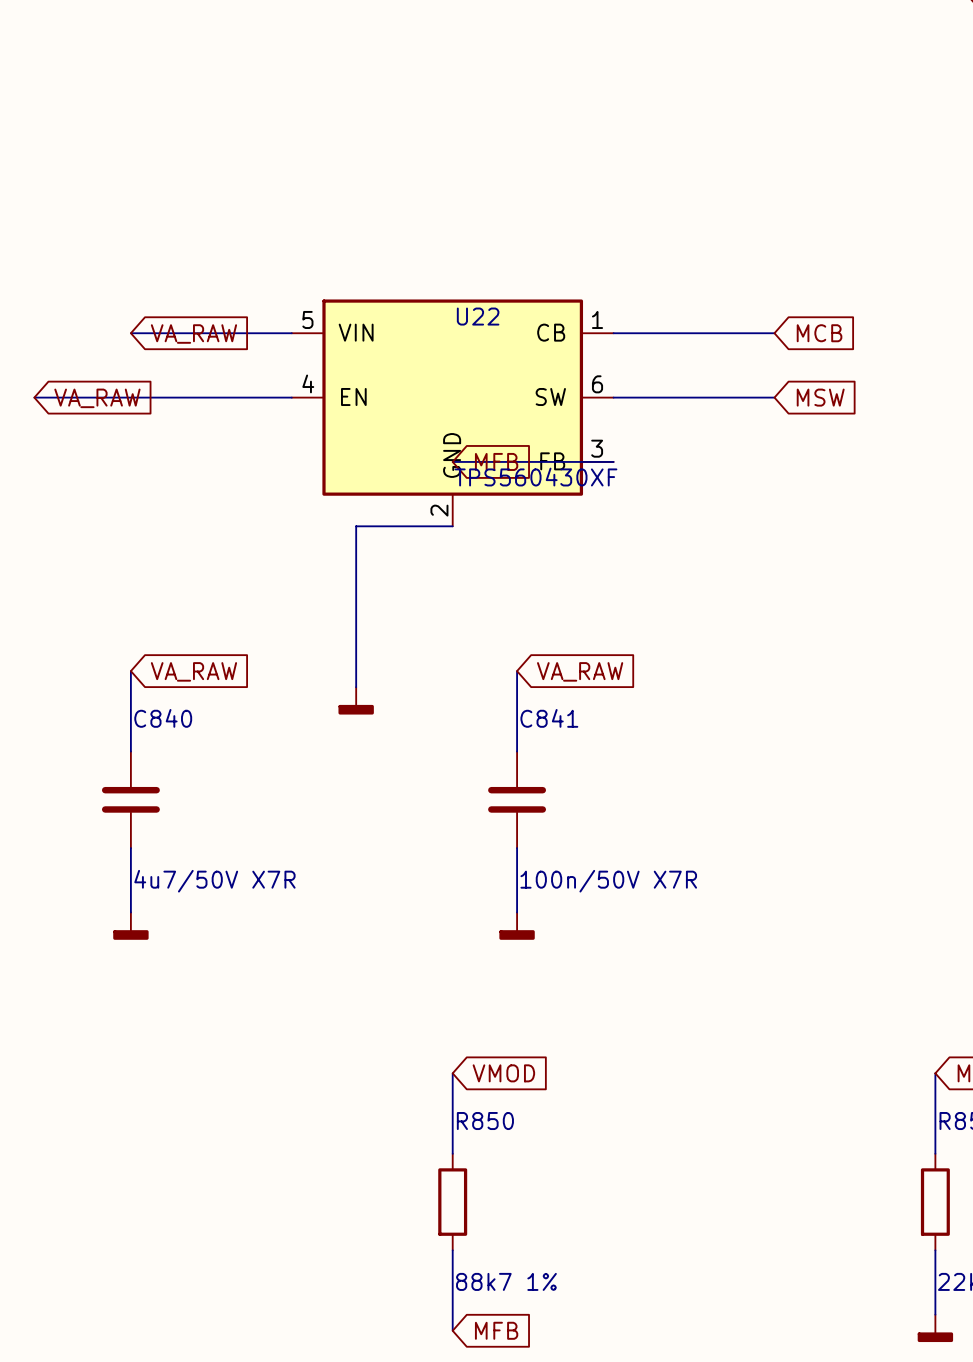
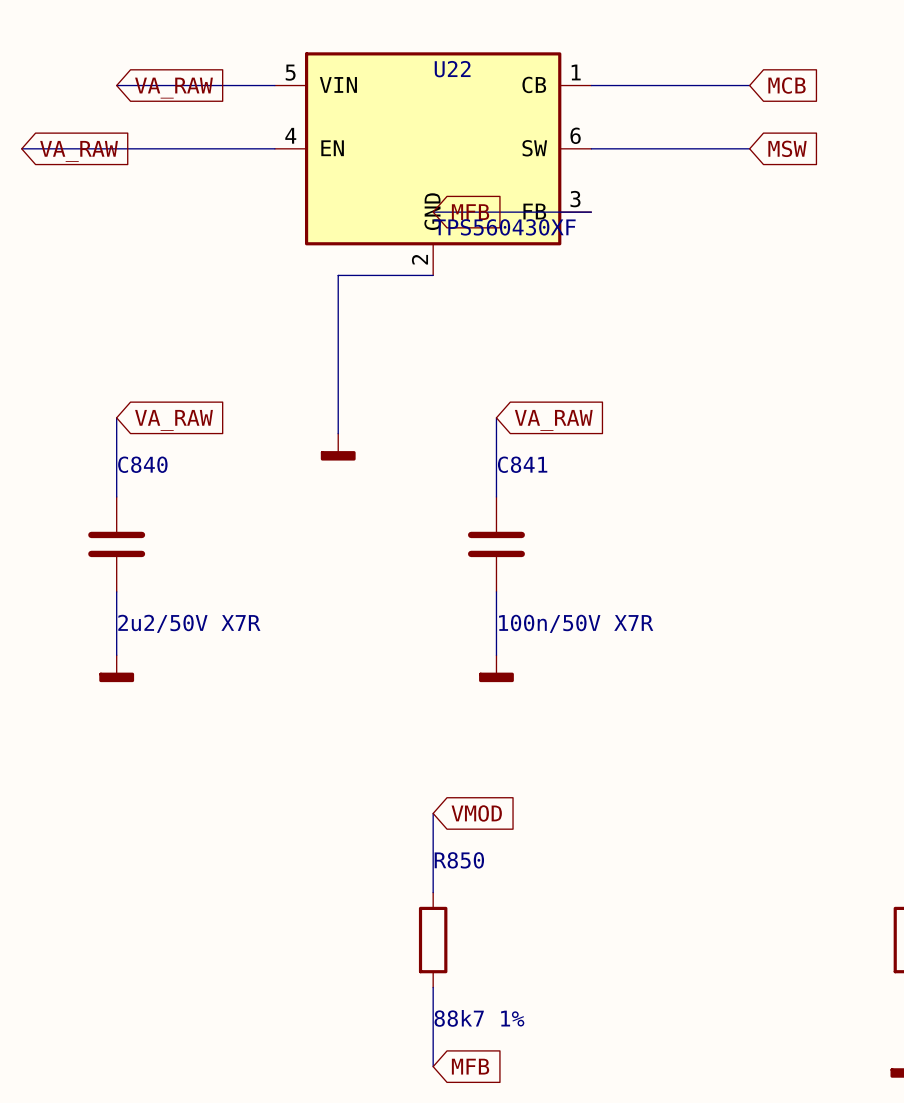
C840 value: 4u7/50V X7R (214, 881) -> 2u2/50V X7R (189, 623)

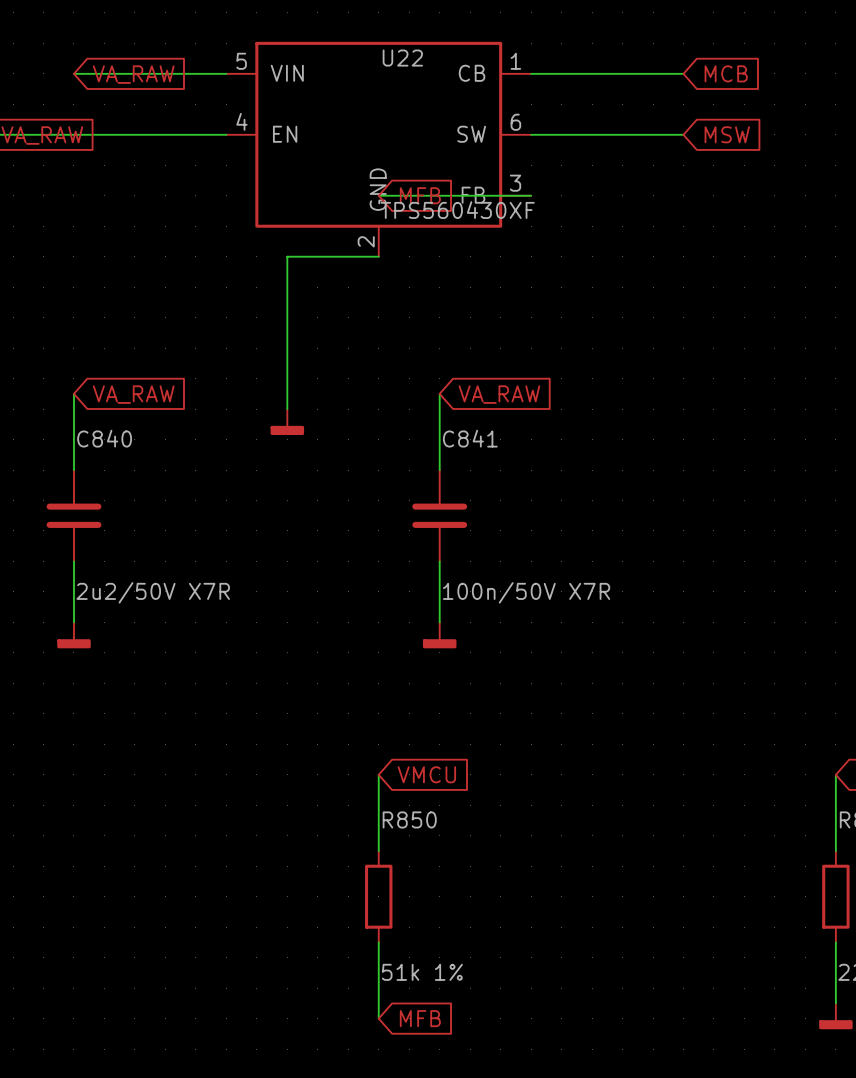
global label: VMOD (476, 813) -> VMCU (426, 774)
R850 value: 88k7 1% (479, 1018) -> 51k 1% (422, 972)

